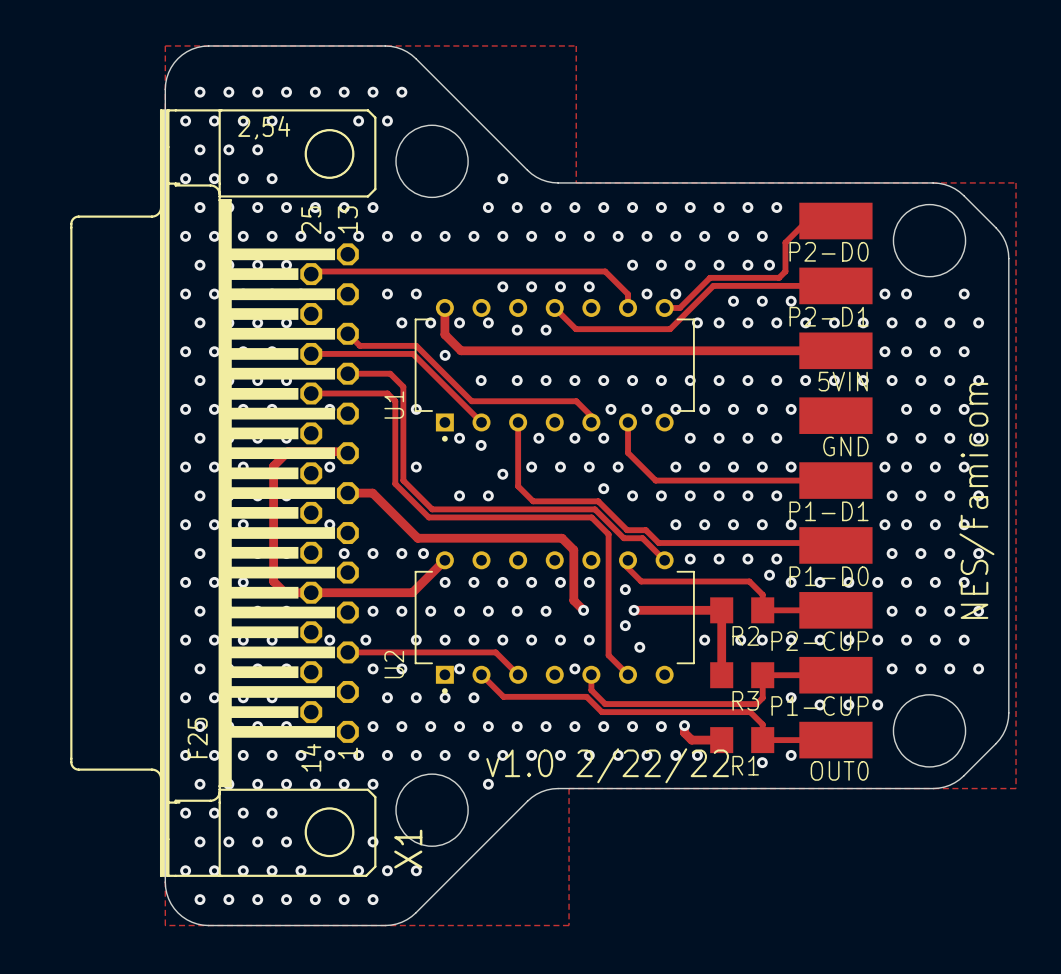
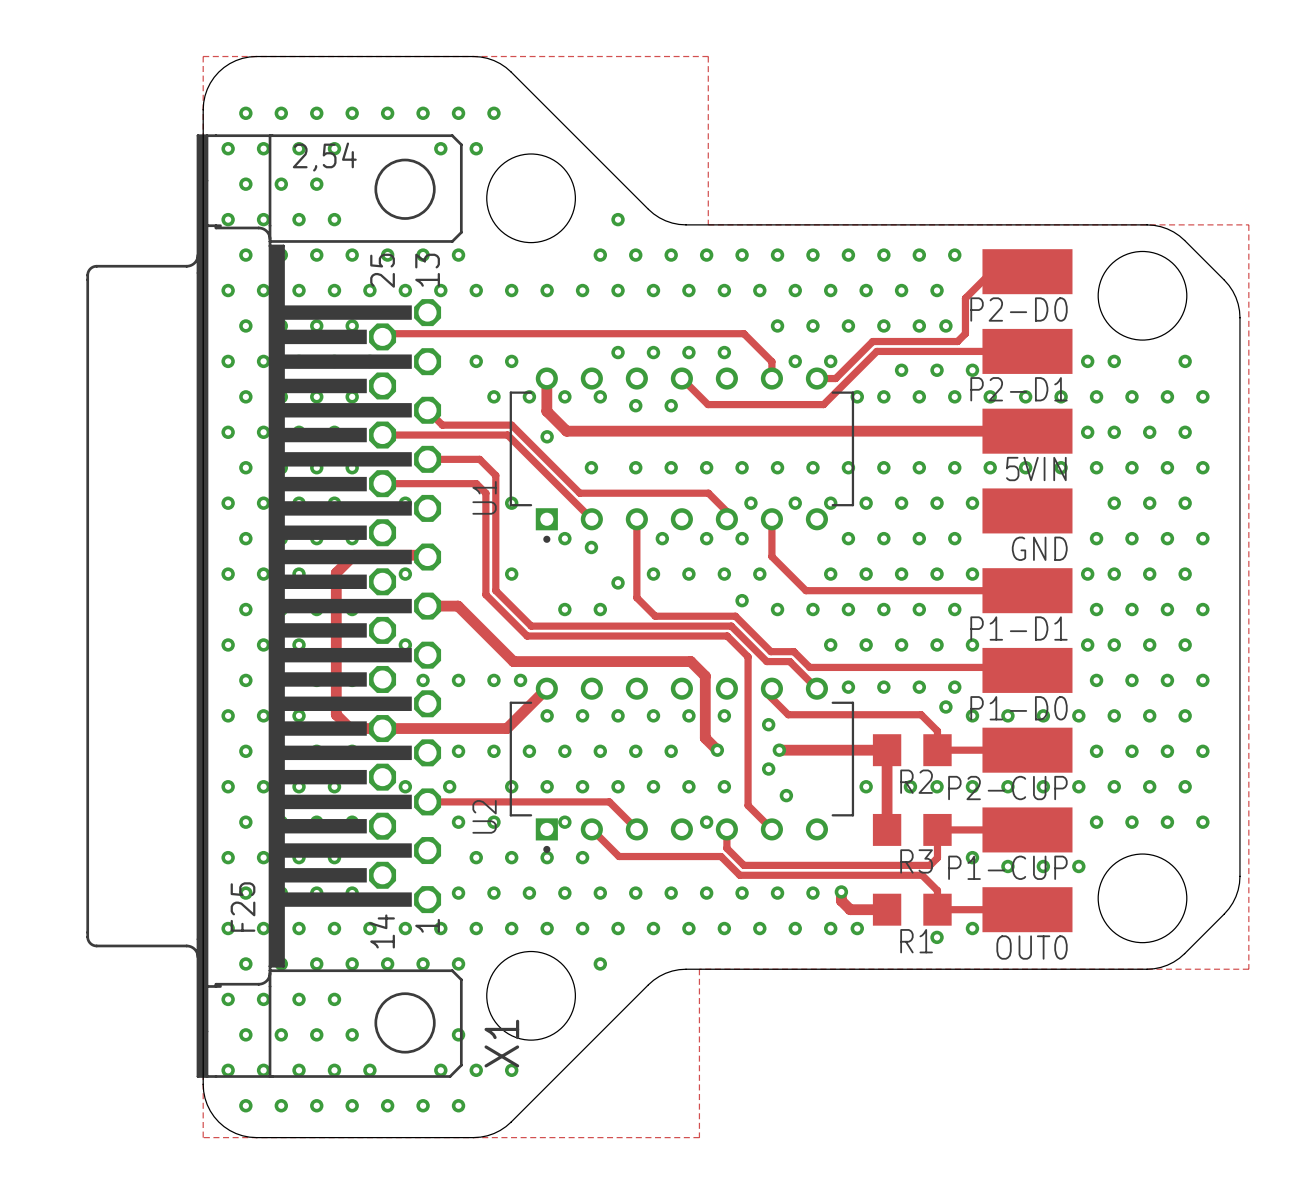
text: NES/Famicom (976, 500) -> none
text: v1.0 2/22/22 (607, 765) -> none

